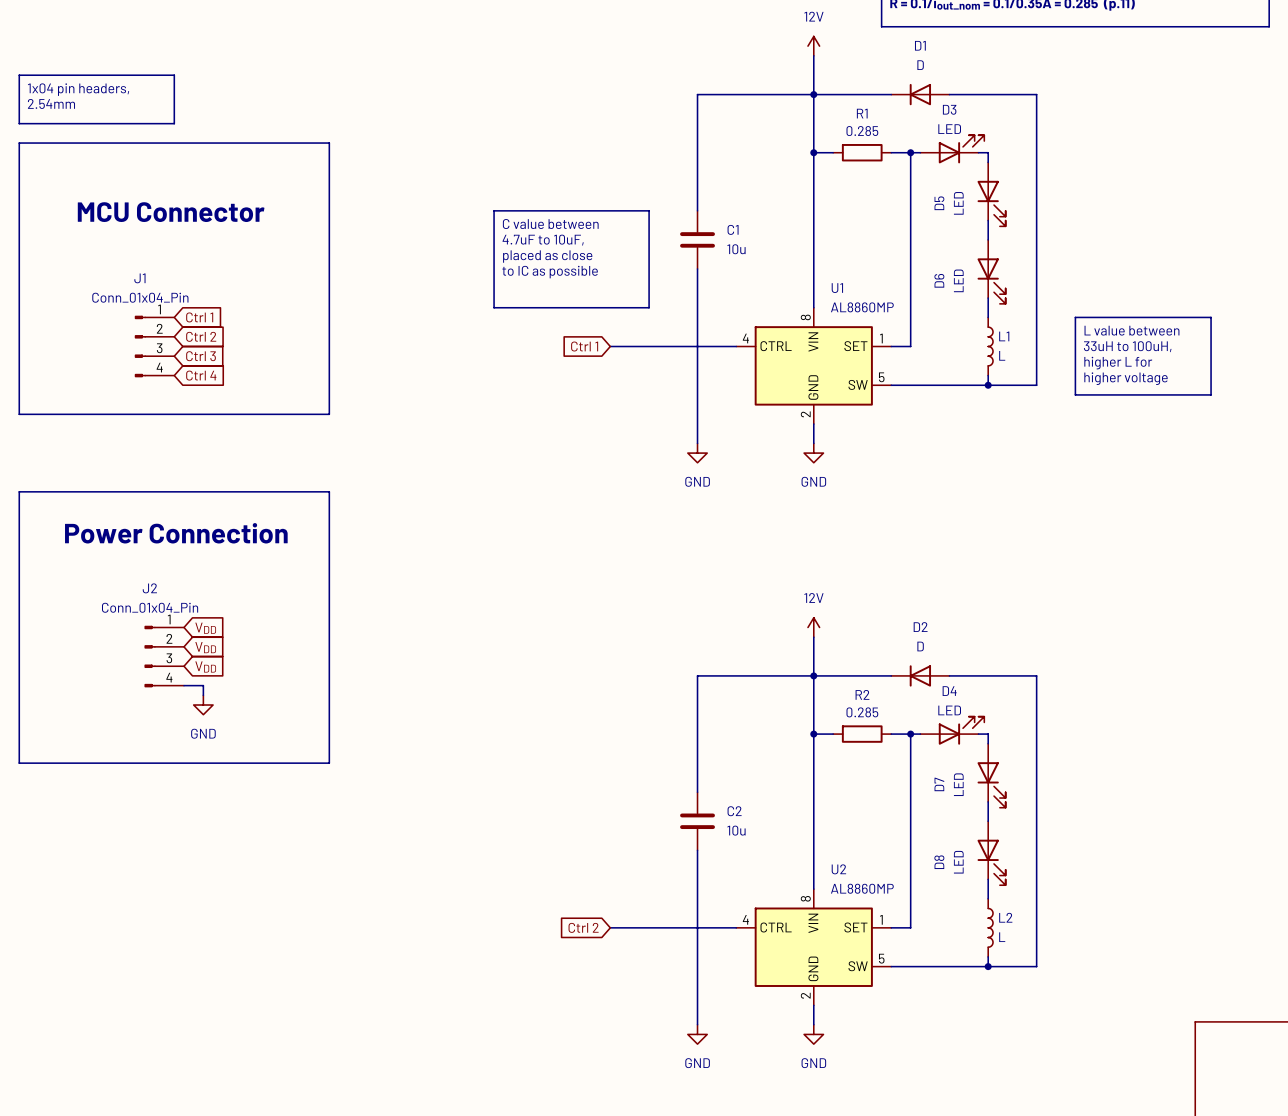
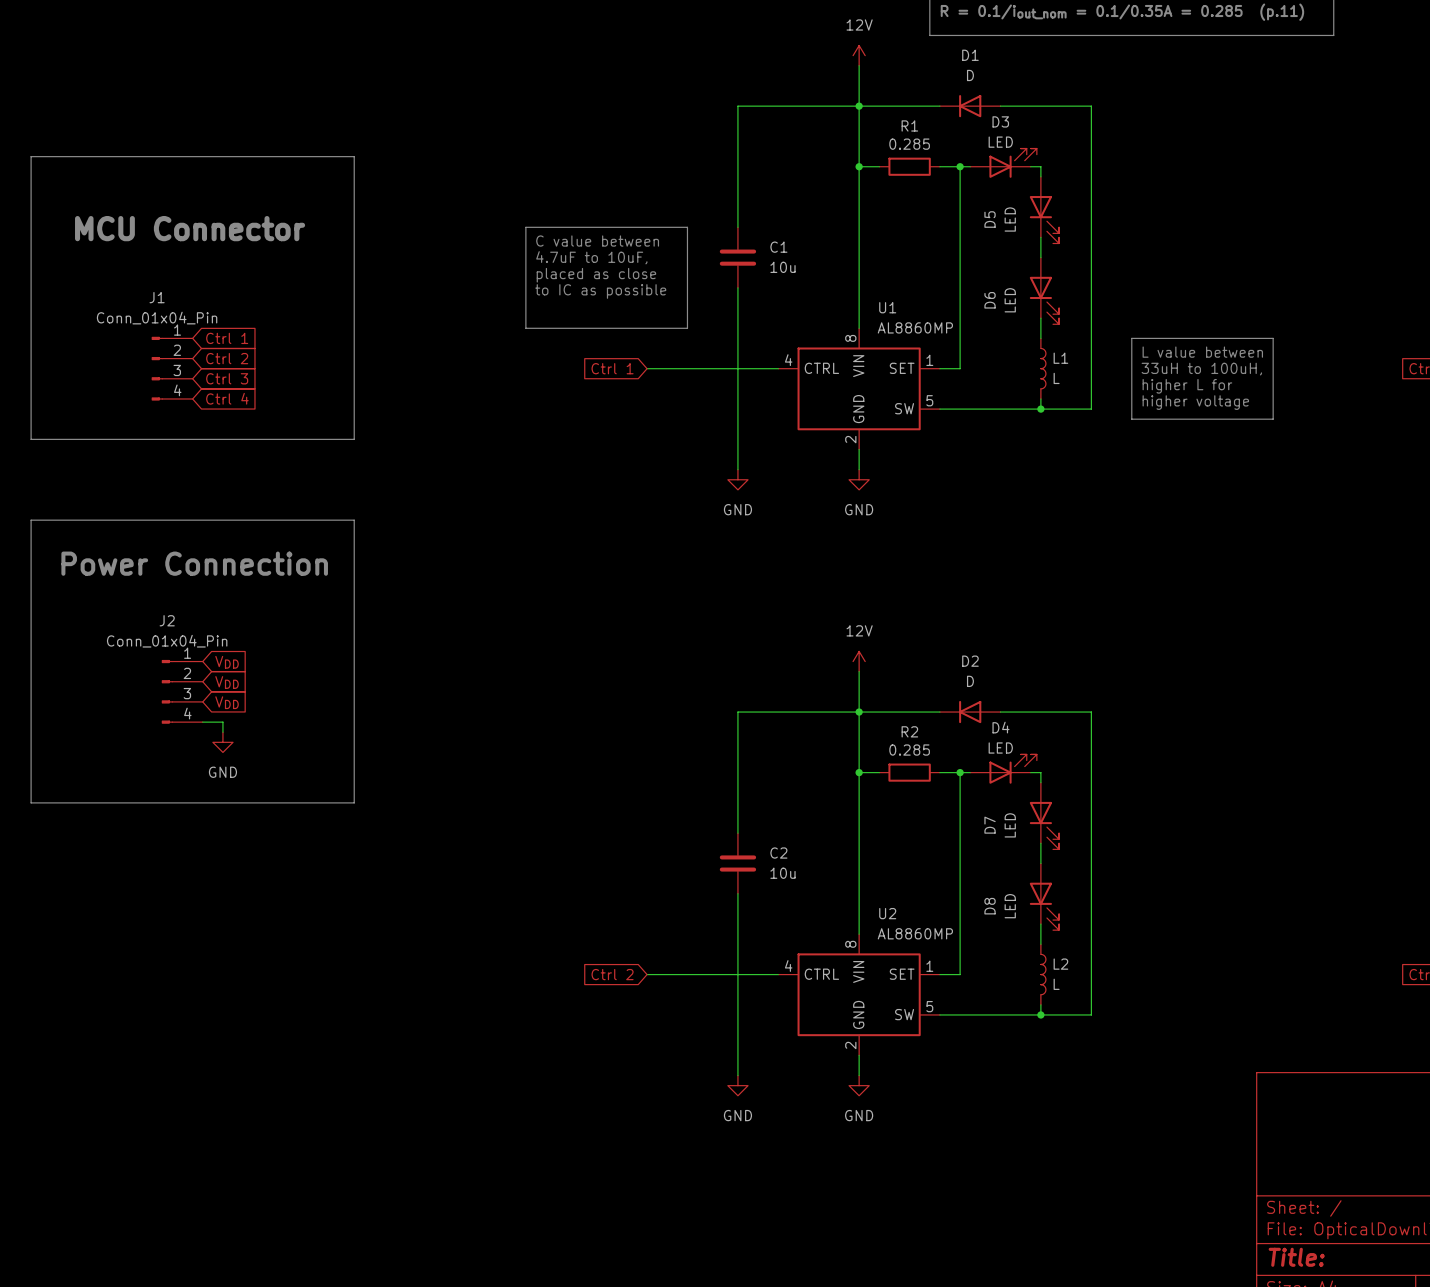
line: (19, 75) (174, 75) (174, 123) (19, 123) (19, 75) -> none
text: 1x04 pin headers, (78, 89) -> none
text: 2.54mm (51, 103) -> none

